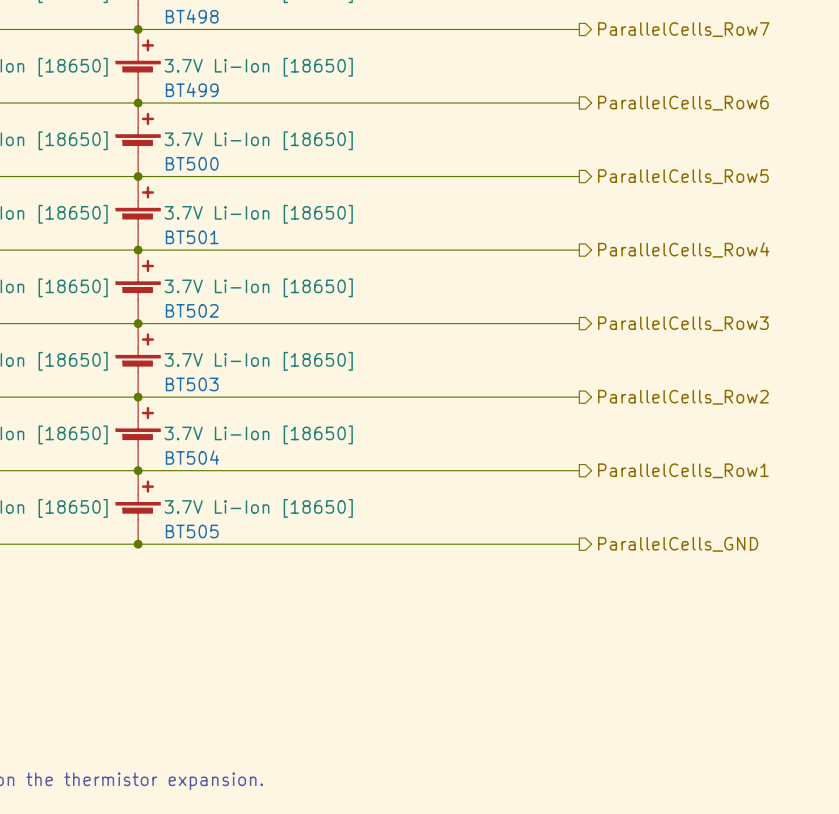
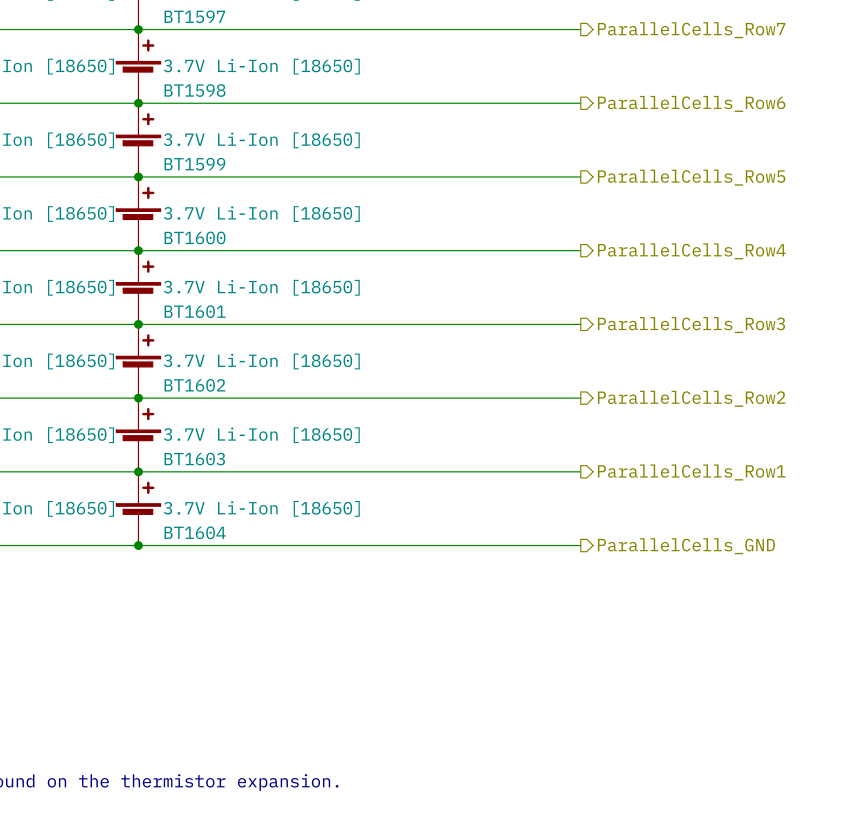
BT498 name: BT498 (192, 16) -> BT1597 (194, 16)
BT499 name: BT499 (192, 90) -> BT1598 (195, 90)
BT500 name: BT500 (192, 163) -> BT1599 (194, 164)
BT501 name: BT501 (192, 237) -> BT1600 (195, 237)
BT502 name: BT502 (192, 310) -> BT1601 (195, 311)
BT503 name: BT503 (192, 384) -> BT1602 (194, 385)
BT504 name: BT504 (192, 457) -> BT1603 (194, 459)
BT505 name: BT505 (192, 531) -> BT1604 (195, 532)

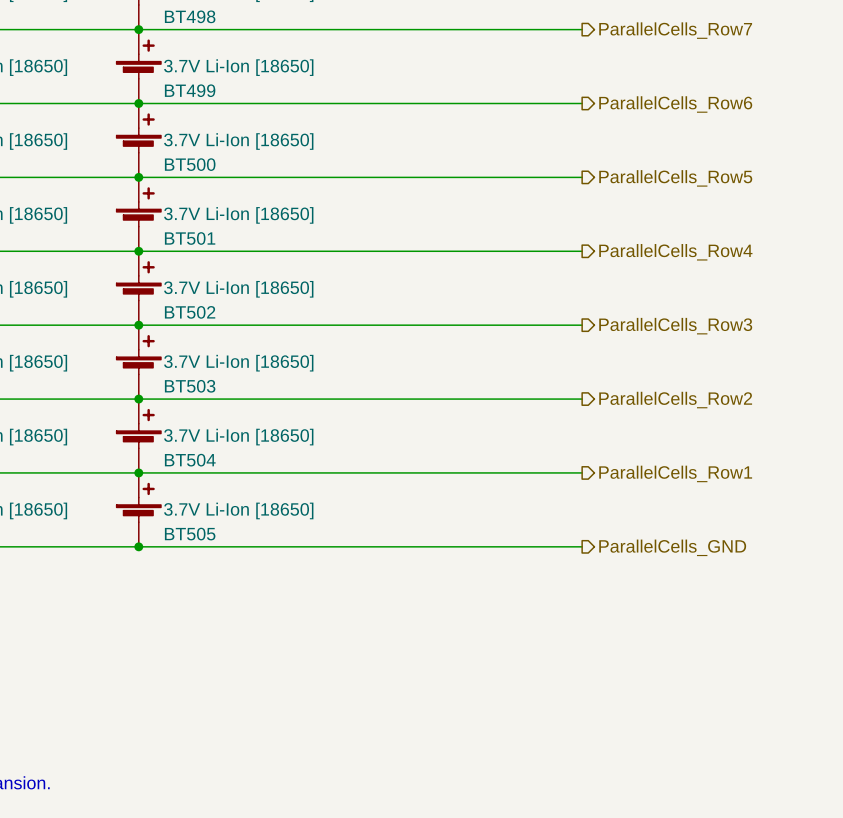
BT1597 name: BT1597 (194, 16) -> BT498 (190, 16)
BT1598 name: BT1598 (195, 90) -> BT499 (190, 90)
BT1599 name: BT1599 (194, 164) -> BT500 (190, 164)
BT1600 name: BT1600 (195, 237) -> BT501 (190, 238)
BT1601 name: BT1601 (195, 311) -> BT502 (190, 312)
BT1602 name: BT1602 (194, 385) -> BT503 (190, 386)
BT1603 name: BT1603 (194, 459) -> BT504 (190, 460)
BT1604 name: BT1604 (195, 532) -> BT505 (190, 534)

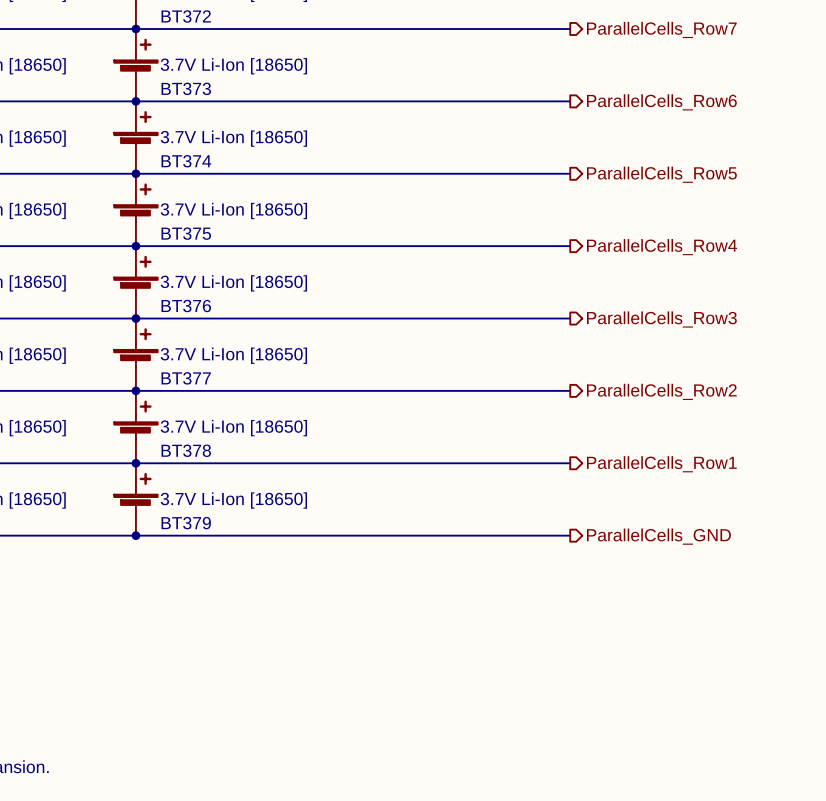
BT498 name: BT498 (190, 16) -> BT372 (186, 16)
BT499 name: BT499 (190, 90) -> BT373 (186, 88)
BT500 name: BT500 (190, 164) -> BT374 (186, 161)
BT501 name: BT501 (190, 238) -> BT375 (186, 233)
BT502 name: BT502 (190, 312) -> BT376 (186, 306)
BT503 name: BT503 (190, 386) -> BT377 (186, 378)
BT504 name: BT504 (190, 460) -> BT378 (186, 450)
BT505 name: BT505 (190, 534) -> BT379 (186, 523)

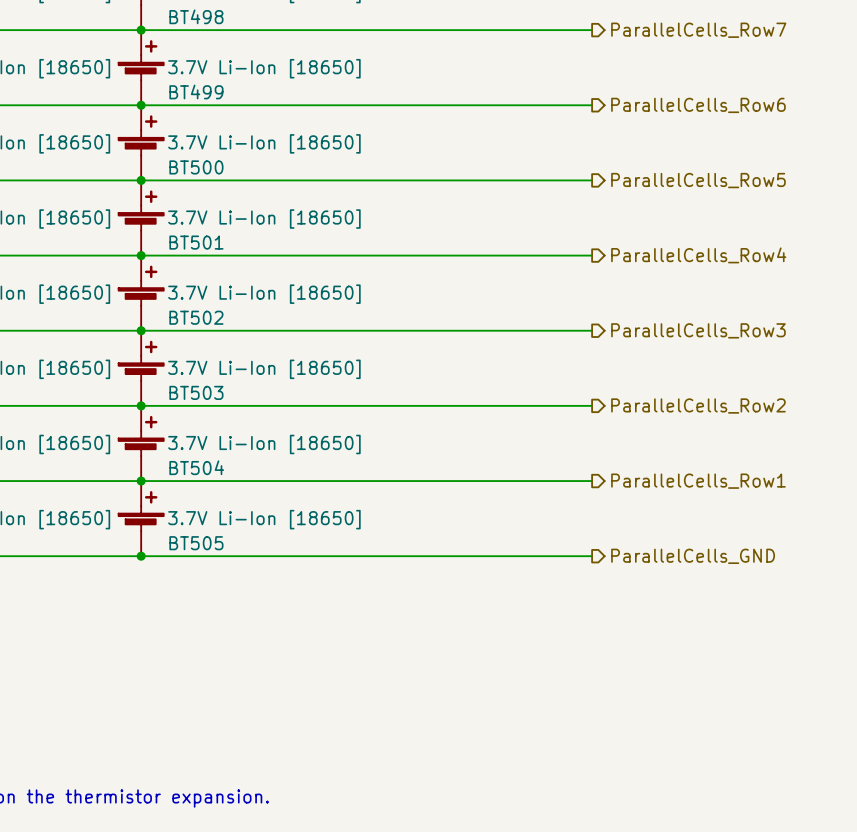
BT372 name: BT372 (186, 16) -> BT498 (196, 16)
BT373 name: BT373 (186, 88) -> BT499 (196, 91)
BT374 name: BT374 (186, 161) -> BT500 (196, 167)
BT375 name: BT375 (186, 233) -> BT501 (196, 242)
BT376 name: BT376 (186, 306) -> BT502 (196, 317)
BT377 name: BT377 (186, 378) -> BT503 (196, 392)
BT378 name: BT378 (186, 450) -> BT504 (196, 467)
BT379 name: BT379 (186, 523) -> BT505 (196, 543)

